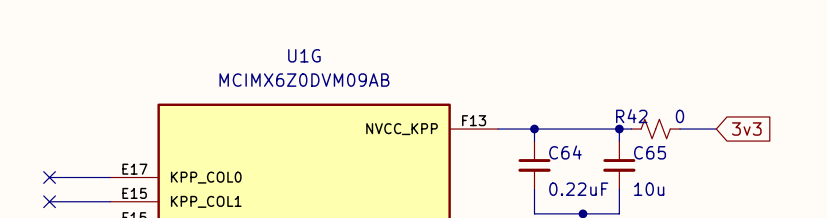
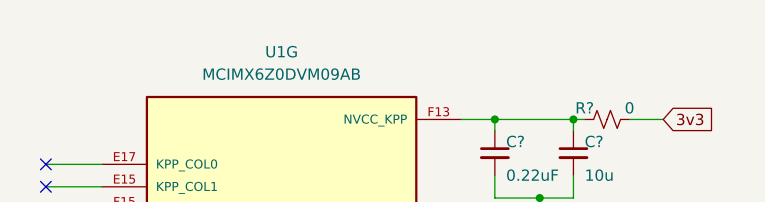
R42 name: R42 (631, 116) -> R? (584, 107)
C64 name: C64 (565, 152) -> C? (515, 141)
C65 name: C65 (650, 152) -> C? (594, 141)

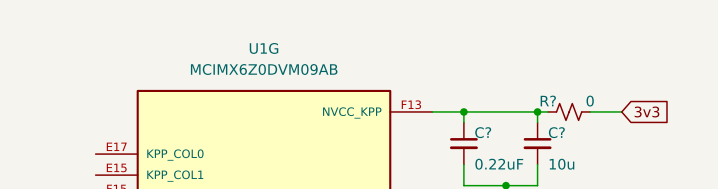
wire: (45, 164) (102, 164) -> none
no-connect mark: (45, 164) -> none
wire: (45, 186) (102, 186) -> none
no-connect mark: (45, 186) -> none

